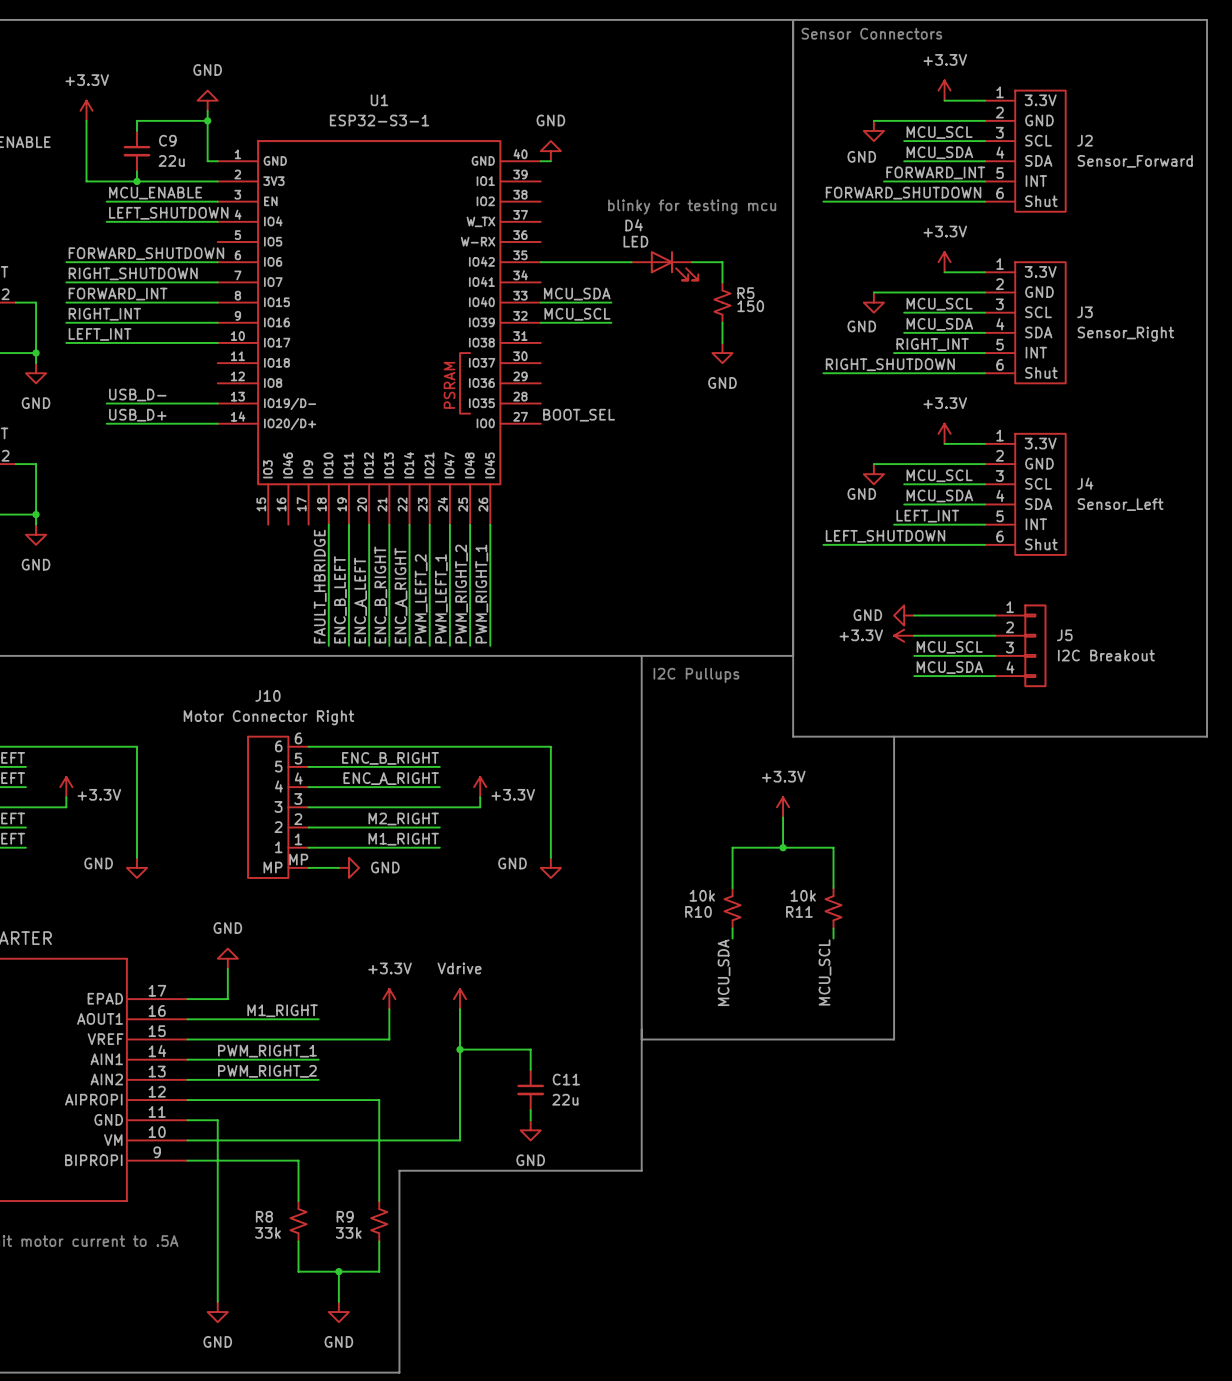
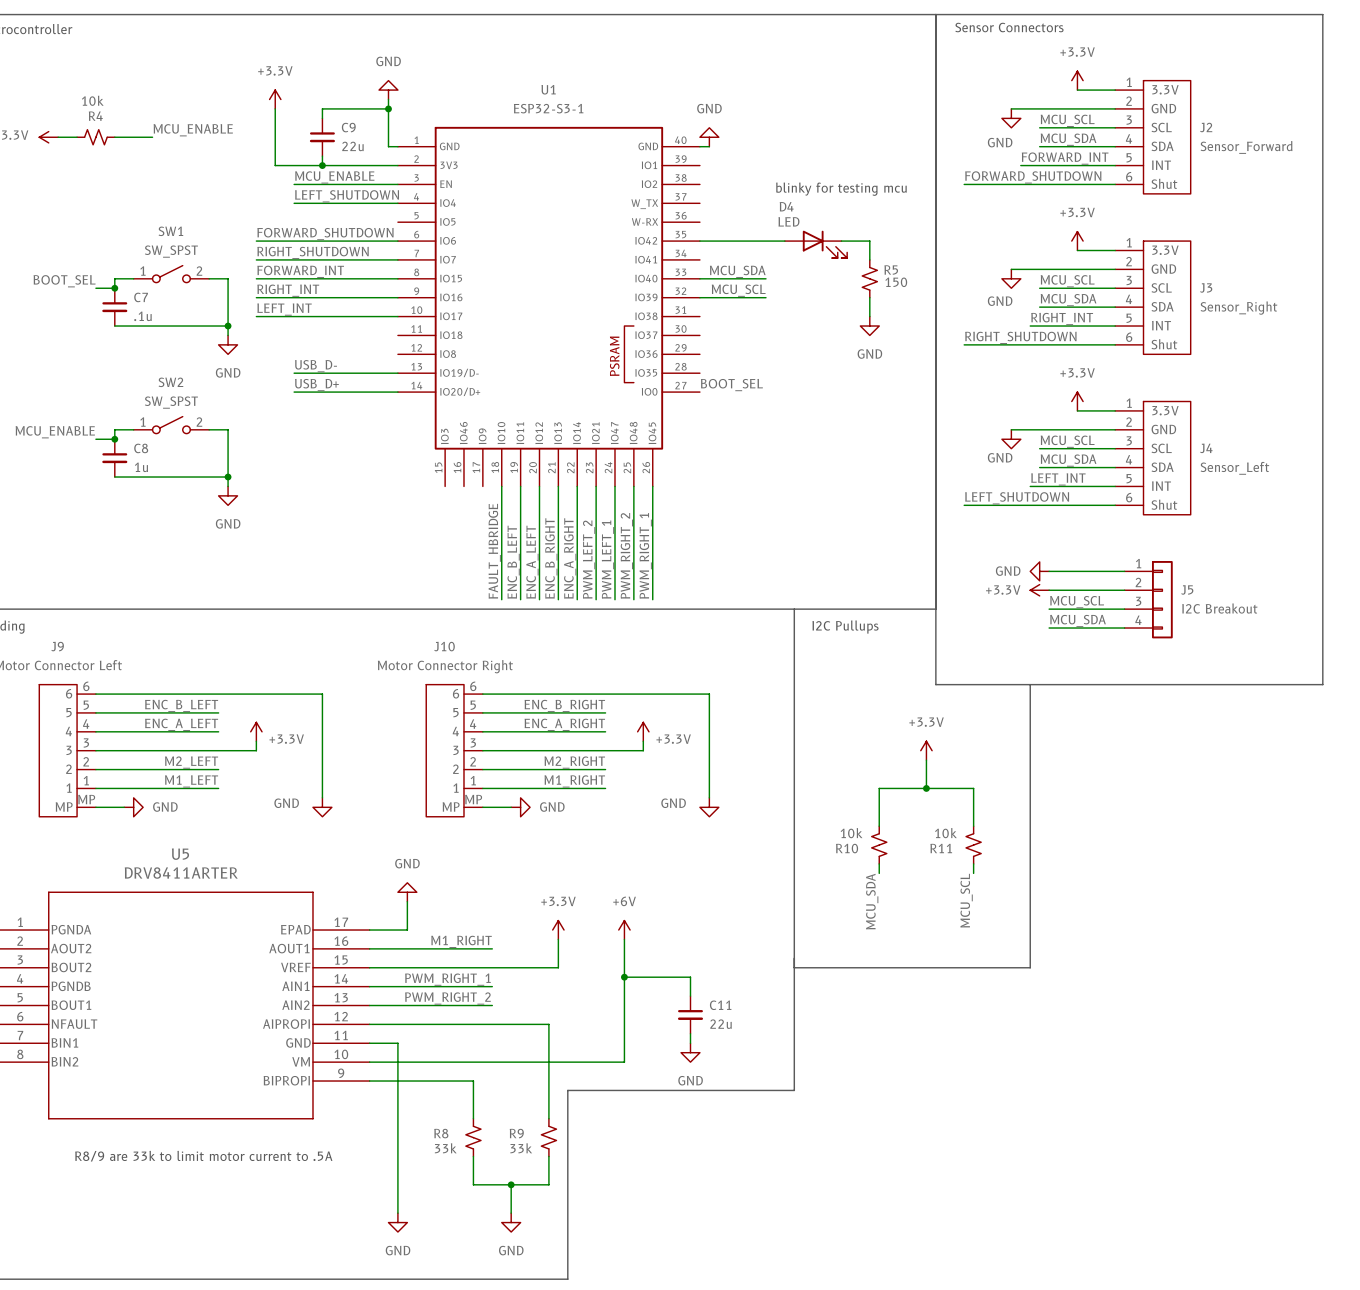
power symbol: Vdrive (460, 999) -> +6V (624, 930)

